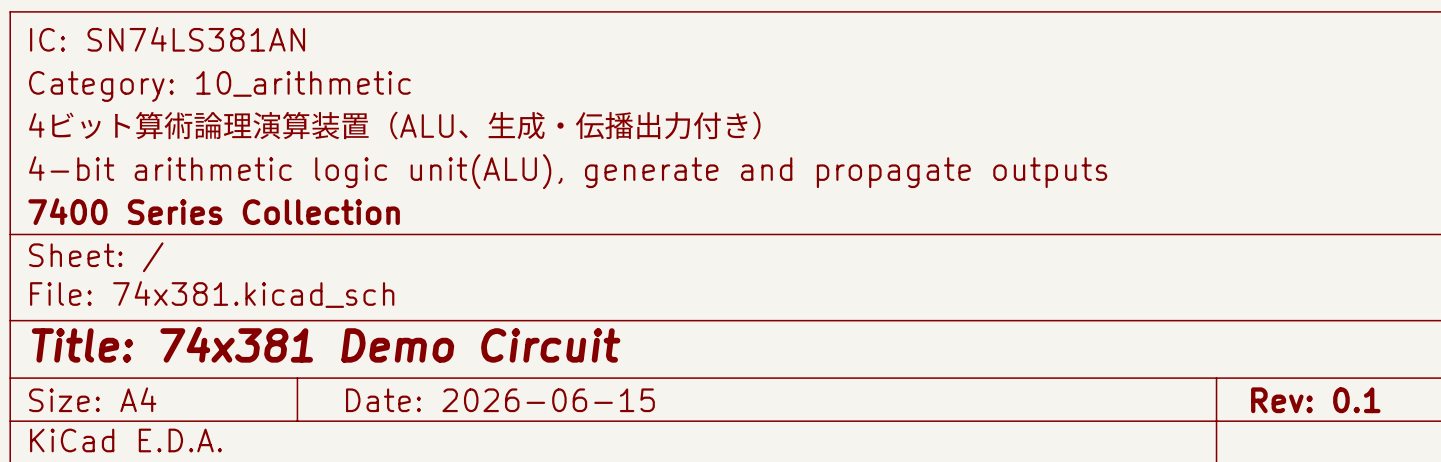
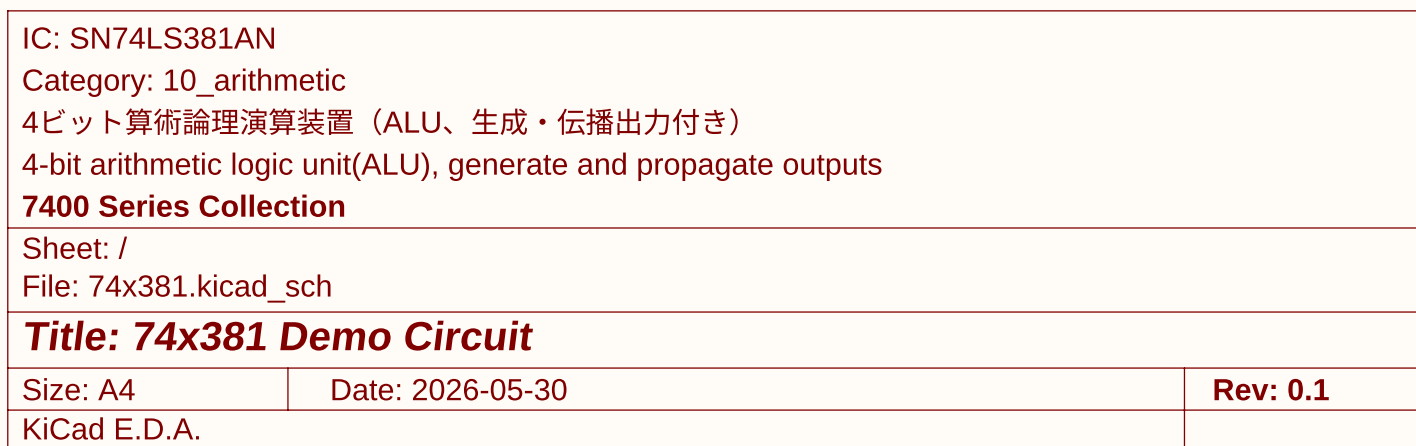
title block: Date: 2026-06-15 (500, 400) -> Date: 2026-05-30 (449, 389)

